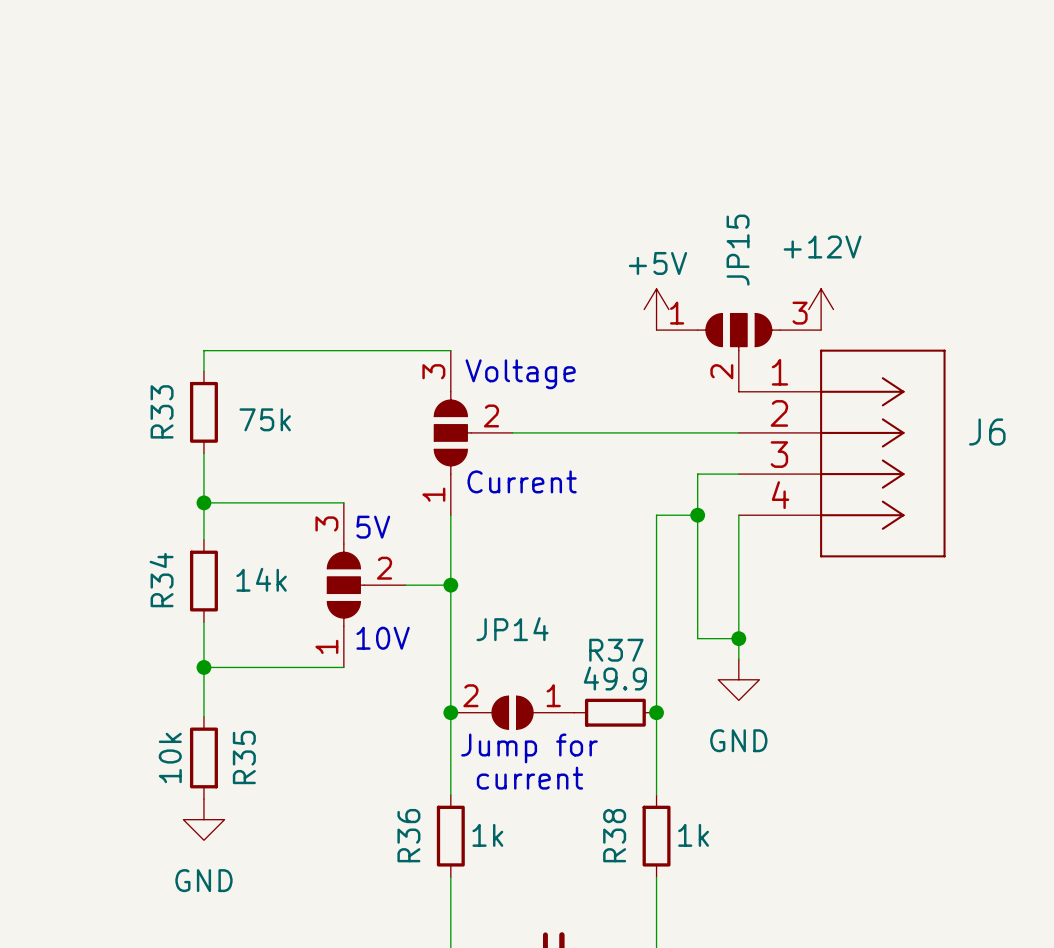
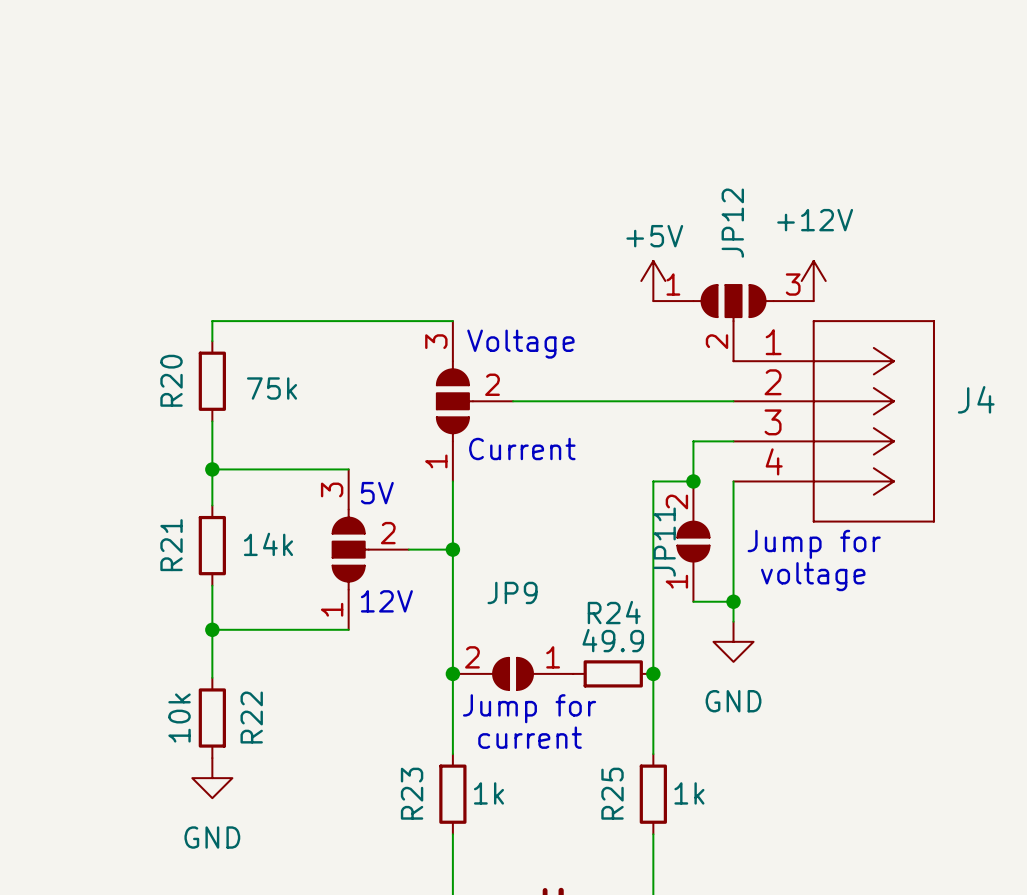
JP15 name: JP15 (738, 250) -> JP12 (732, 223)
R33 name: R33 (162, 411) -> R20 (171, 380)
J6 name: J6 (987, 432) -> J4 (976, 399)
JP11: none -> (693, 541)
text: none -> Jump for (814, 544)
R34 name: R34 (161, 580) -> R21 (171, 545)
text: none -> voltage (813, 576)
JP14 name: JP14 (512, 629) -> JP9 (512, 592)
text: 10V (383, 638) -> 12V (386, 601)
R37 name: R37 (616, 650) -> R24 (614, 612)
R35 name: R35 (244, 757) -> R22 (251, 717)
R36 name: R36 (408, 835) -> R23 (412, 793)
R38 name: R38 (614, 835) -> R25 (612, 793)

